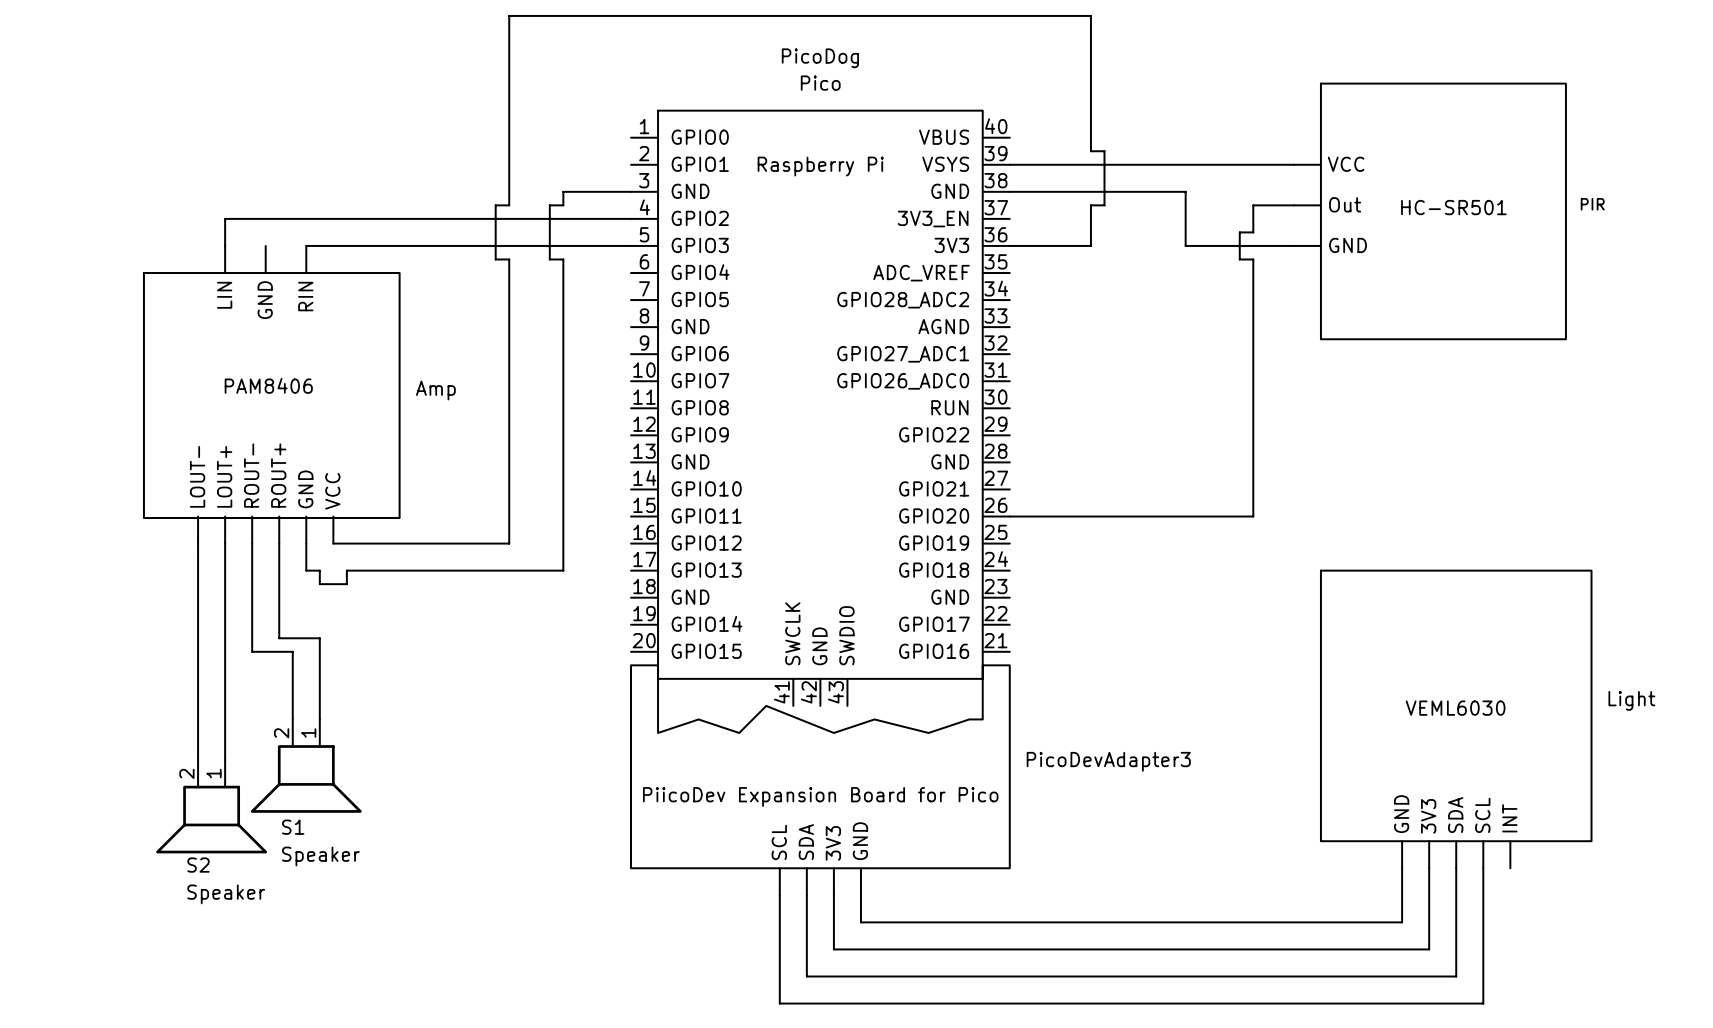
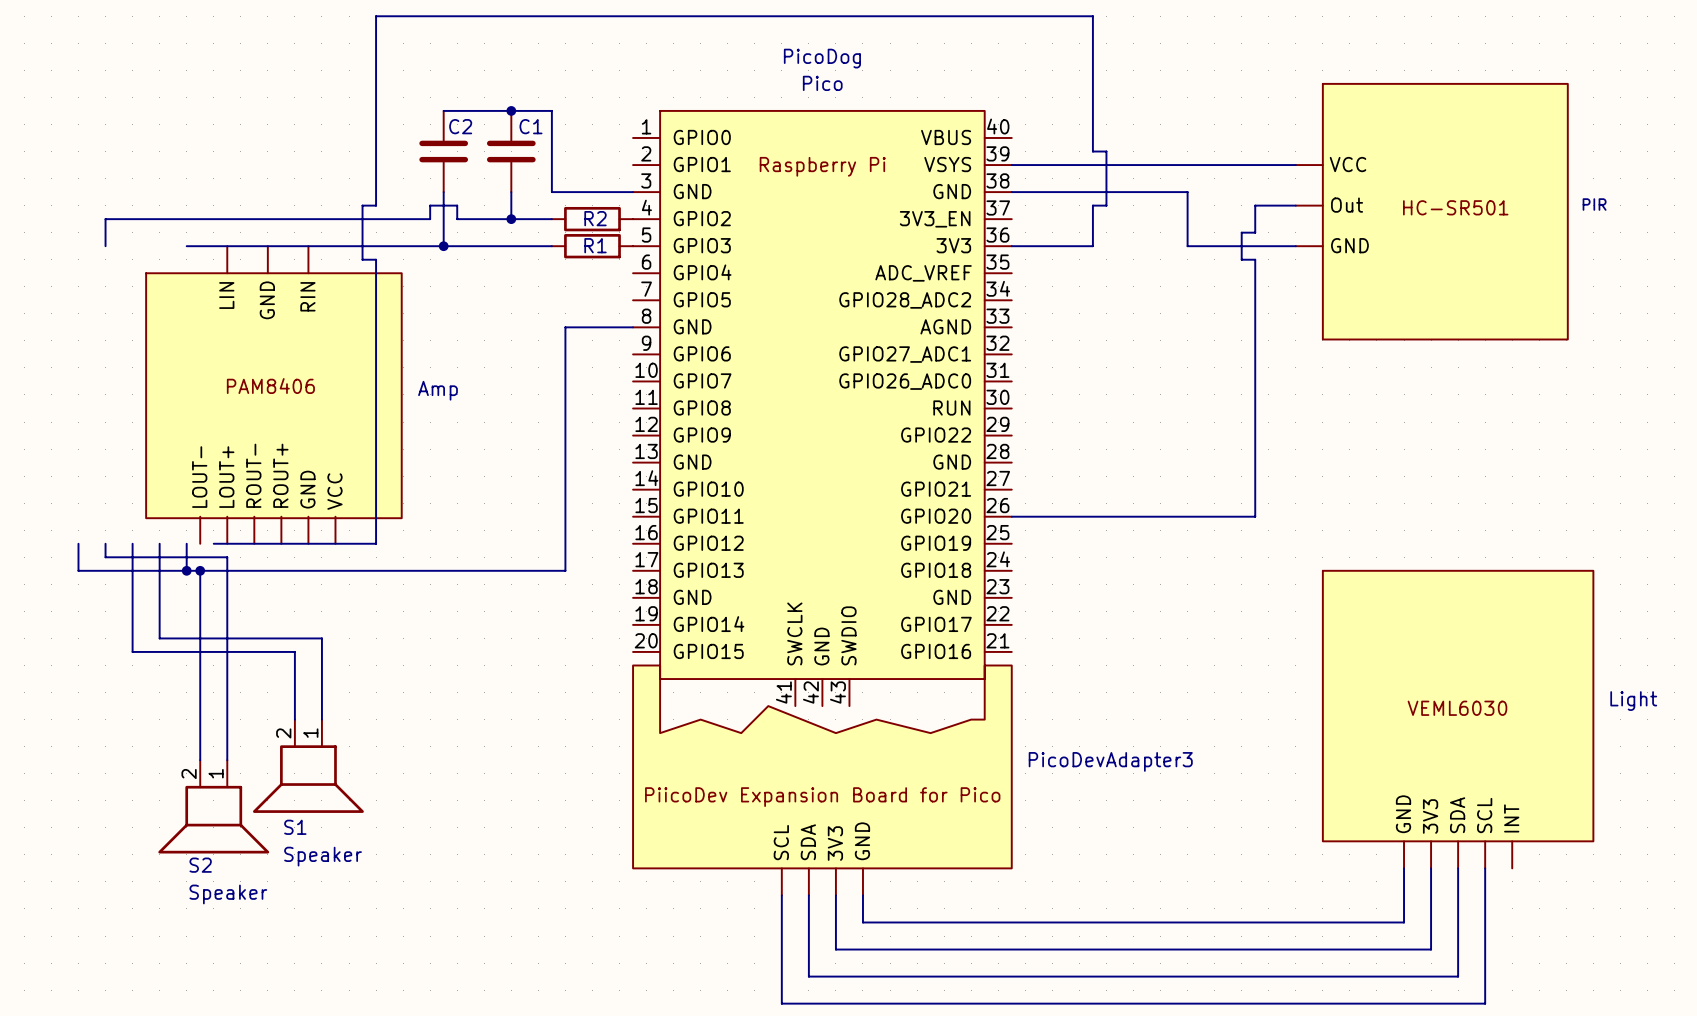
wire: (509, 15) (509, 191) -> none
wire: none -> (443, 110) (551, 110) (551, 192) (565, 192)
junction: none -> (511, 110)
C2: none -> (443, 151)
C1: none -> (511, 151)
wire: none -> (443, 192) (443, 246)
wire: (563, 191) (563, 205) (549, 205) (549, 259) (563, 259) (563, 327) -> (633, 327) (565, 327)
wire: (509, 205) (495, 205) (495, 259) (509, 259) (509, 543) (373, 543) -> (511, 16) (376, 16) (376, 205) (362, 205) (362, 259) (376, 259) (376, 543)
wire: none -> (511, 205) (511, 219)
wire: (225, 218) (225, 245) -> (227, 219) (105, 219) (105, 246)
wire: (428, 218) (455, 218) -> (430, 219) (430, 205) (457, 205) (457, 219)
junction: none -> (511, 219)
wire: (549, 218) (630, 218) -> none
R2: none -> (592, 219)
wire: none -> (186, 246) (308, 246)
junction: none -> (443, 246)
wire: (549, 245) (630, 245) -> none
R1: none -> (592, 246)
wire: (198, 543) (198, 570) -> (186, 543) (186, 570)
wire: none -> (213, 543) (335, 543)
wire: (225, 543) (225, 557) -> (105, 543) (105, 557) (227, 557)
wire: (252, 543) (252, 651) -> (132, 543) (132, 651) (254, 651)
wire: (279, 543) (279, 638) -> (159, 543) (159, 638) (281, 638)
wire: (306, 543) (306, 570) -> (78, 543) (78, 570) (308, 570)
junction: none -> (186, 570)
junction: none -> (200, 570)
wire: (319, 570) (319, 584) (346, 584) (346, 570) -> (321, 570) (349, 570)

